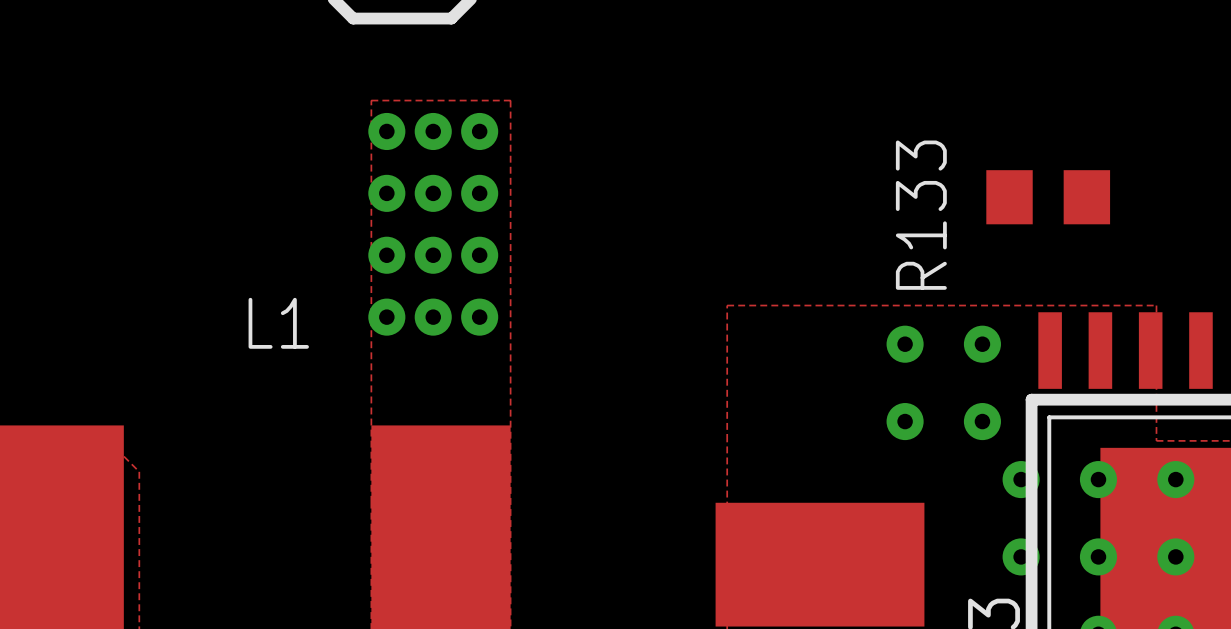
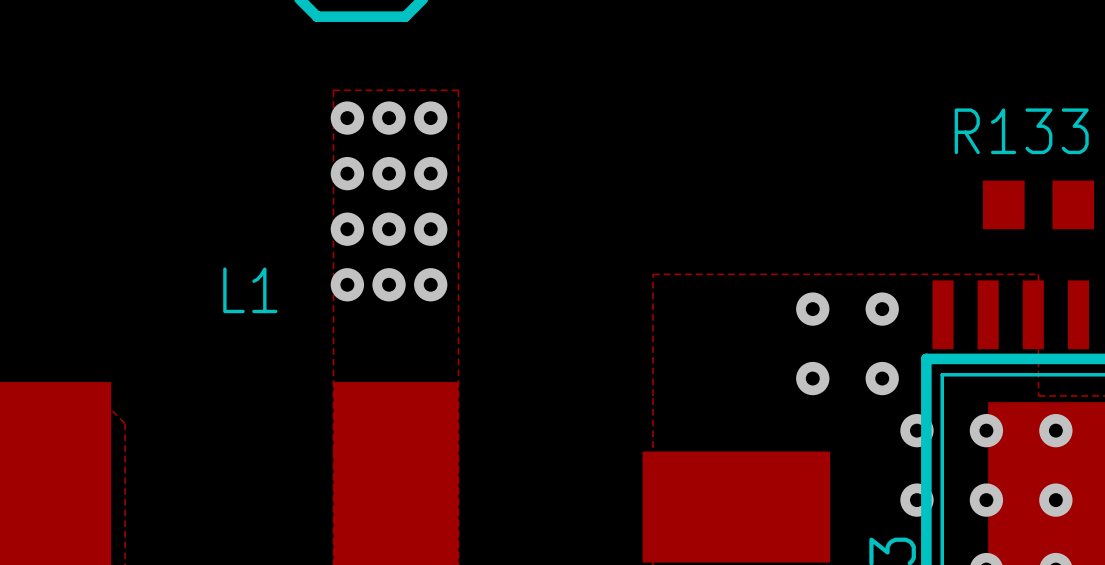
R133 position: (1048, 197) -> (1038, 204)
R133 name rotation: 0° (921, 215) -> 90° clockwise (1021, 131)

